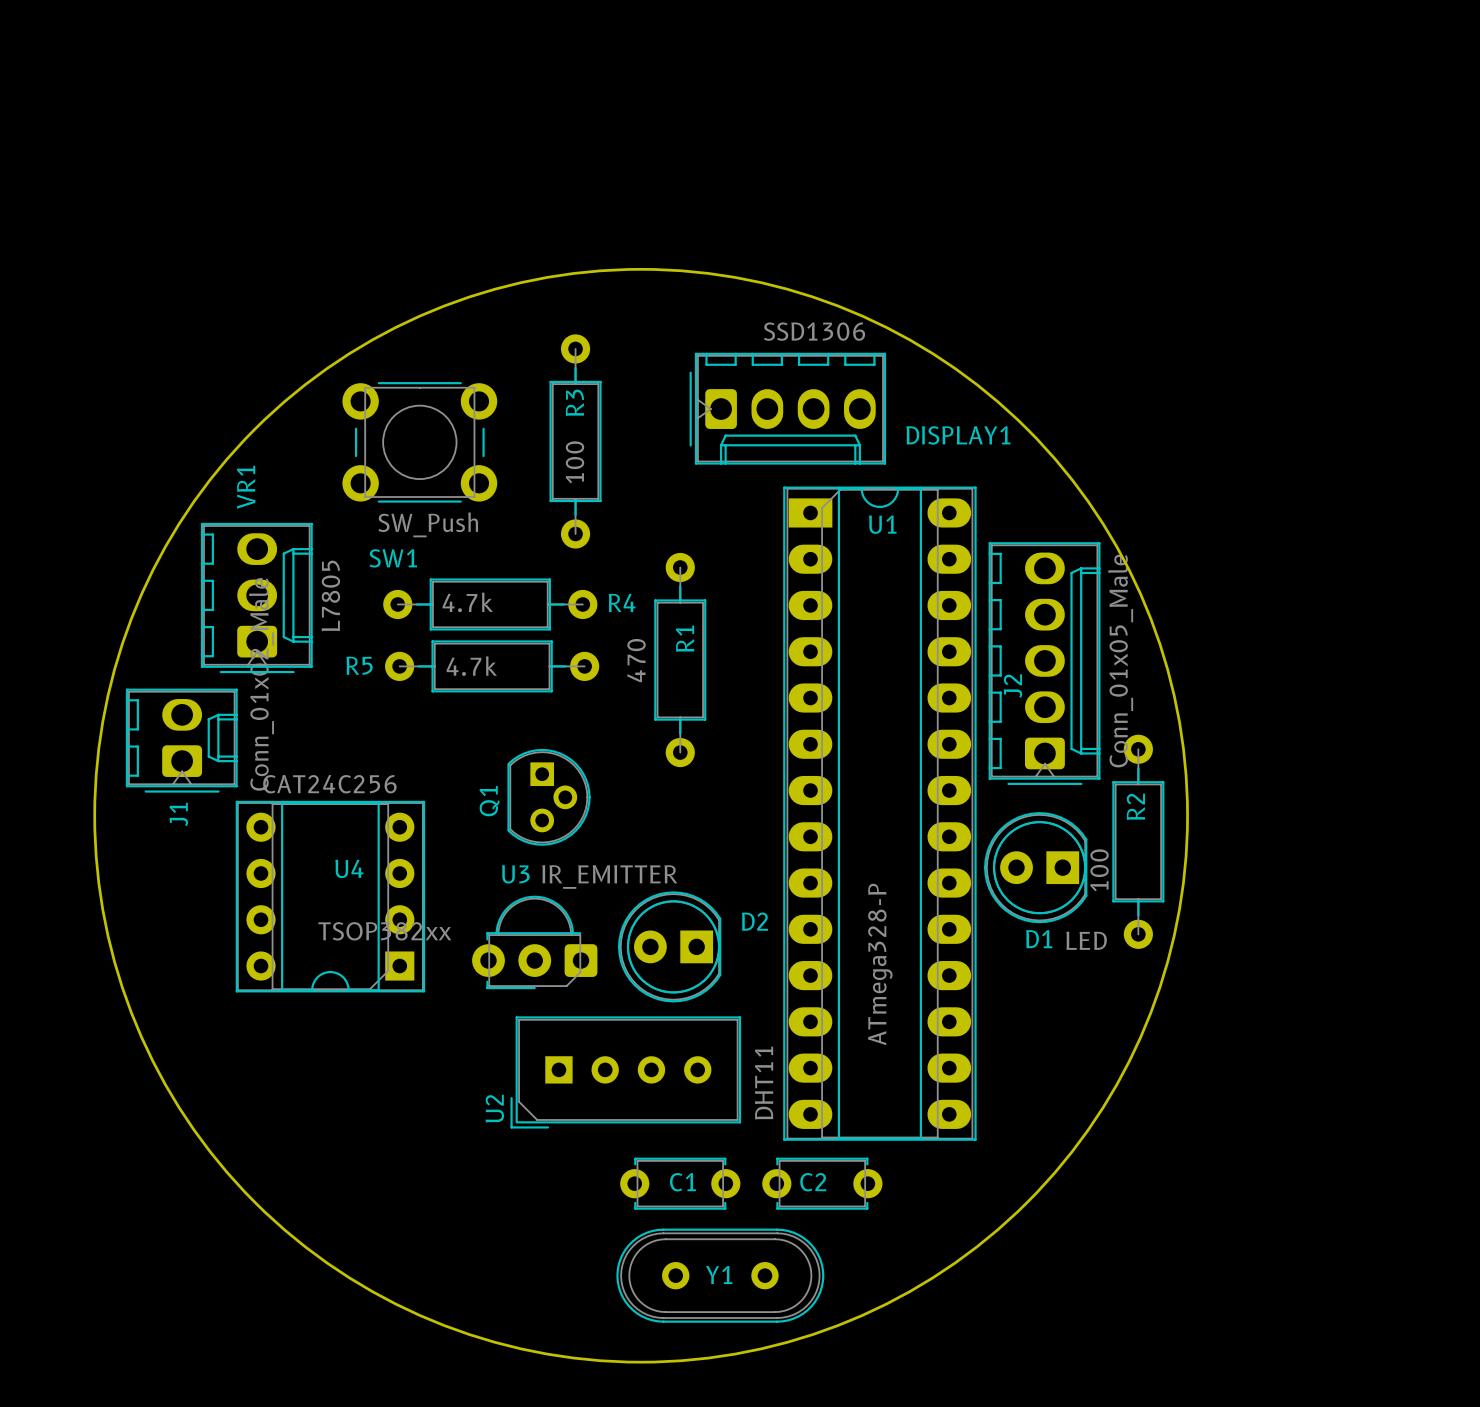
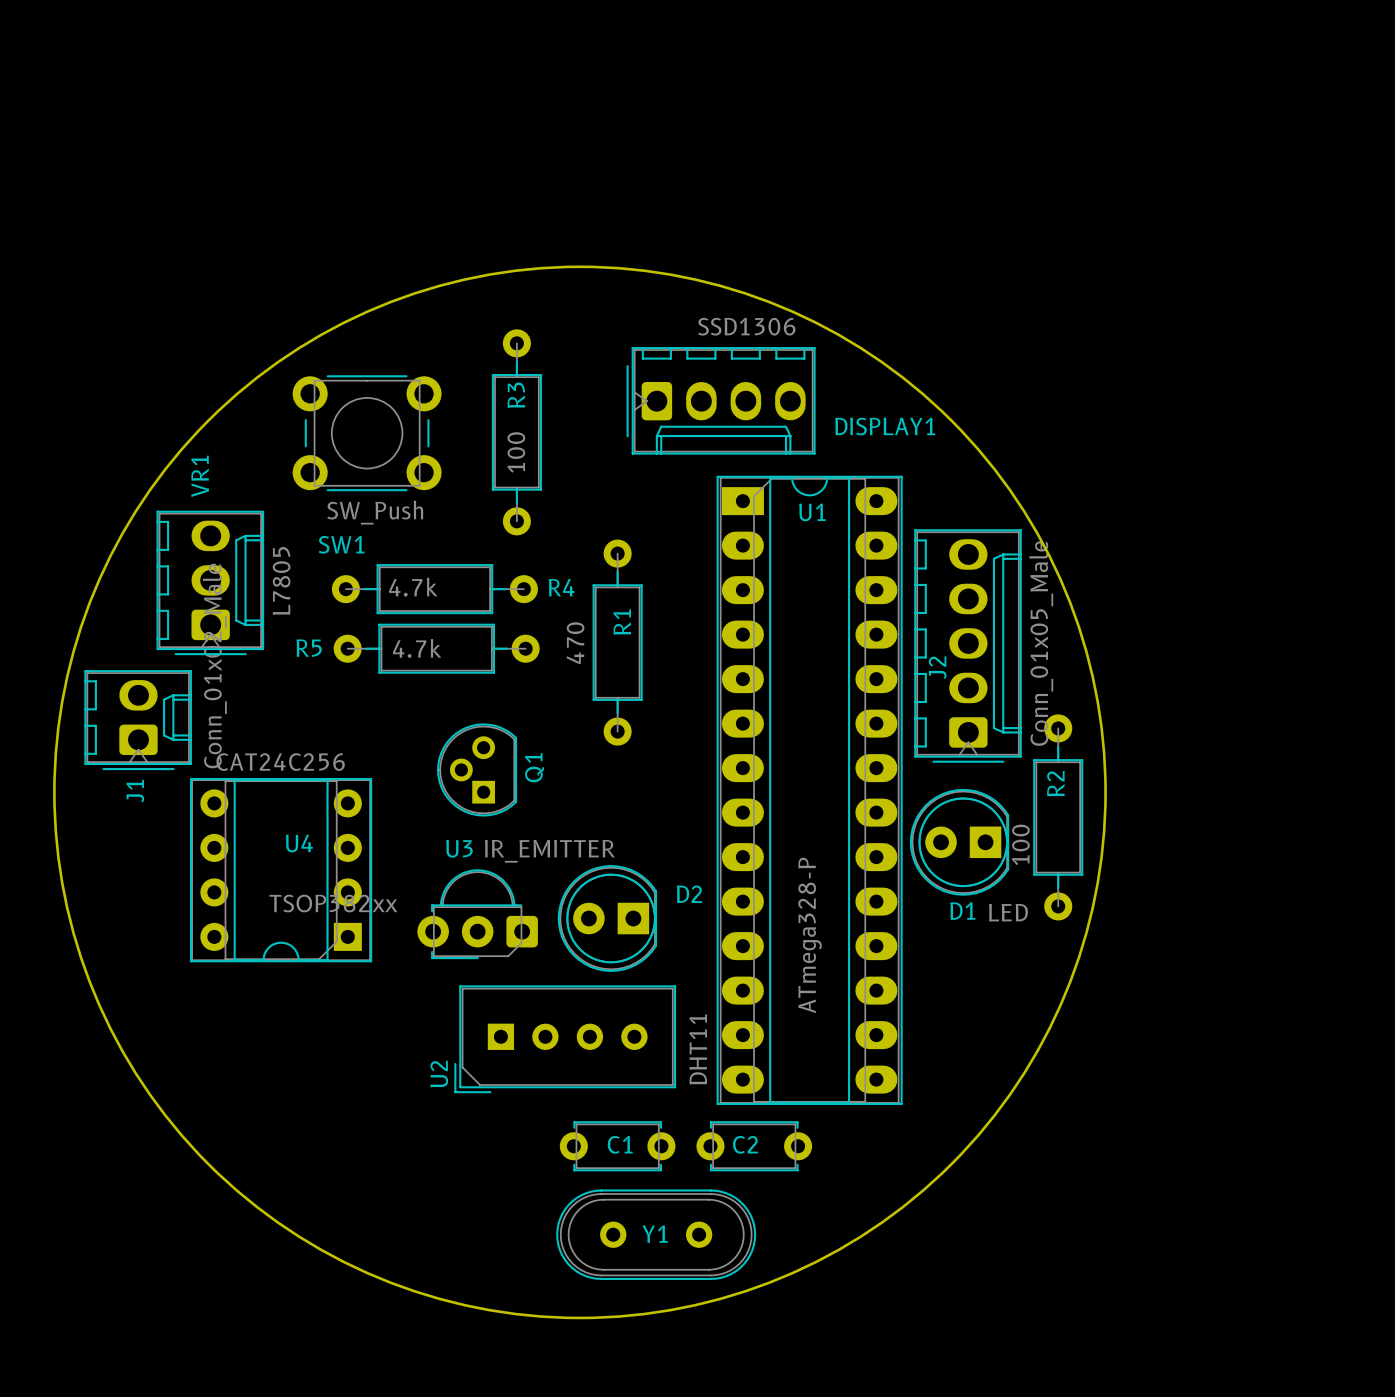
Q1 rotation: 0° (549, 797) -> 180° (477, 769)

